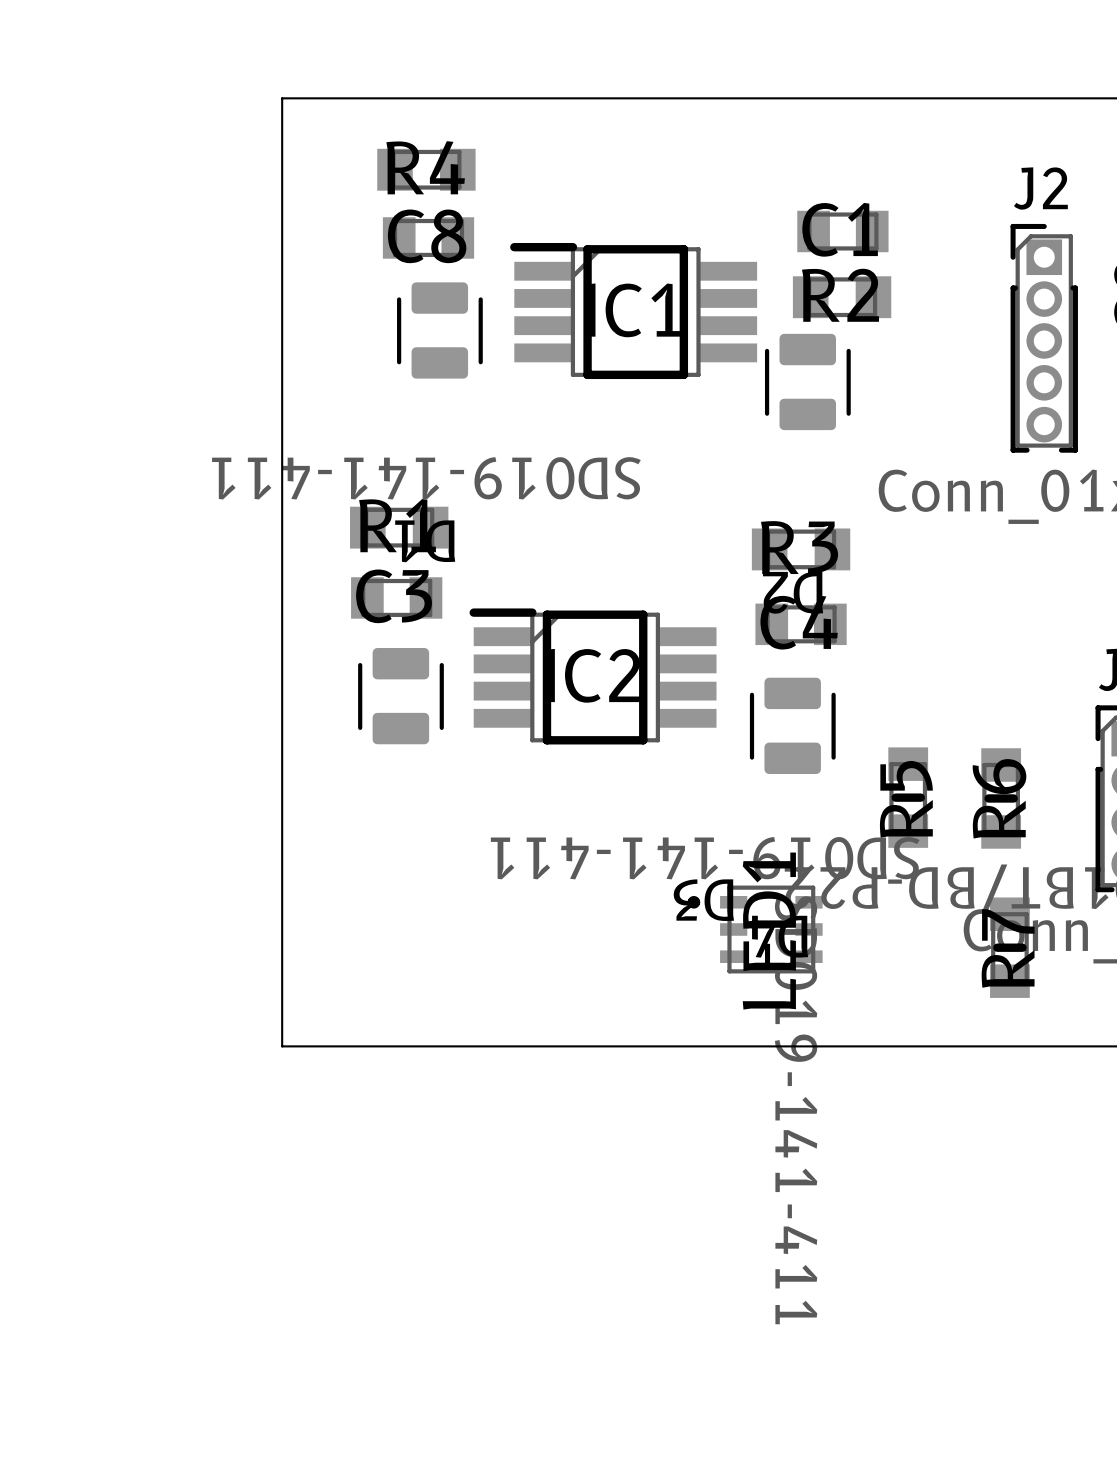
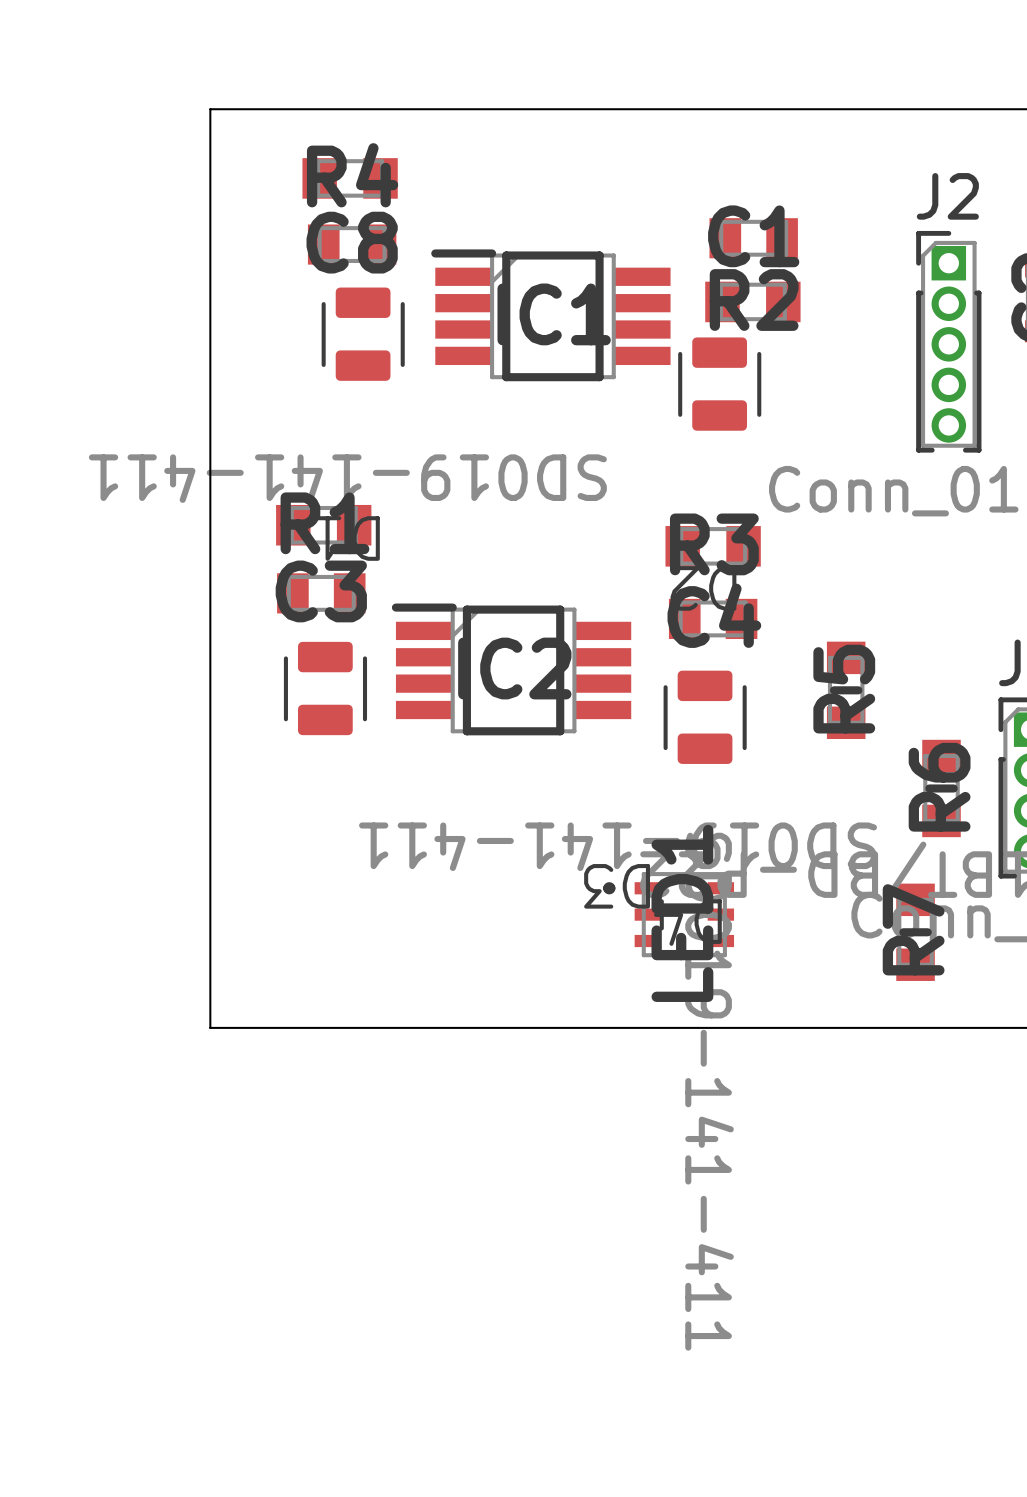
R5 position: (908, 797) -> (846, 690)
R6 position: (1001, 798) -> (941, 788)

